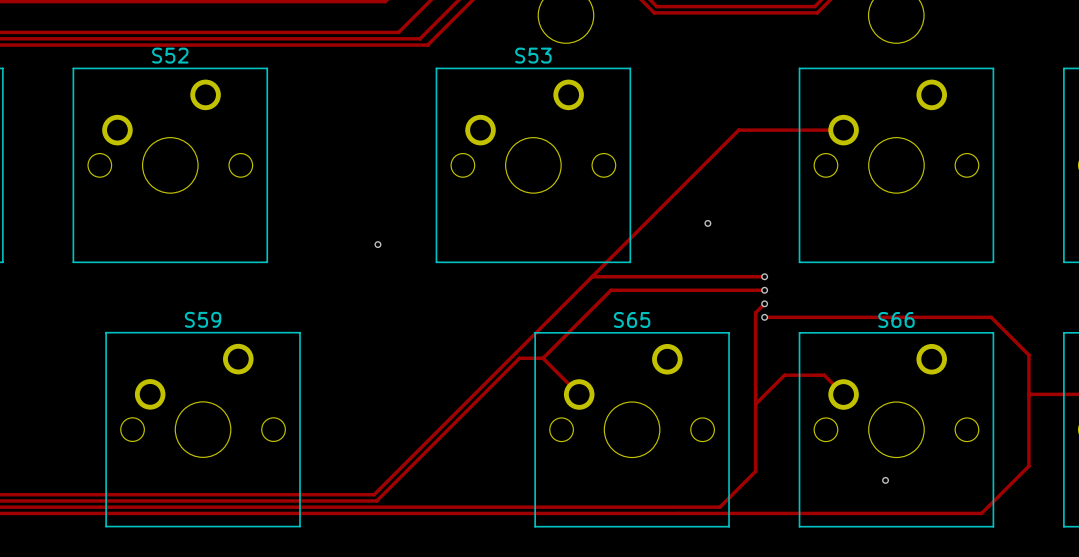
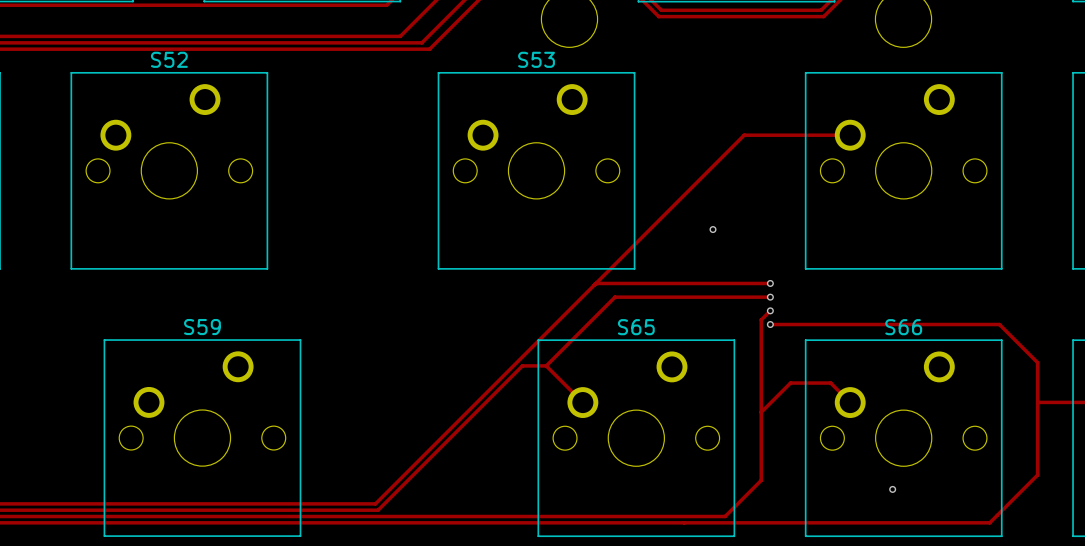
via: (377, 244) -> none

